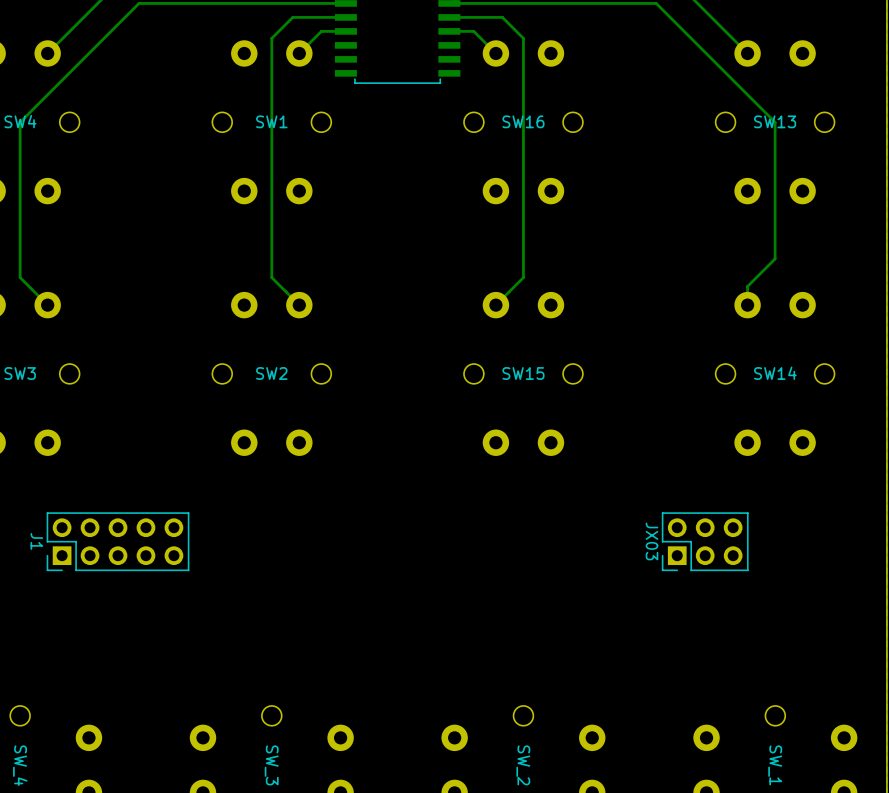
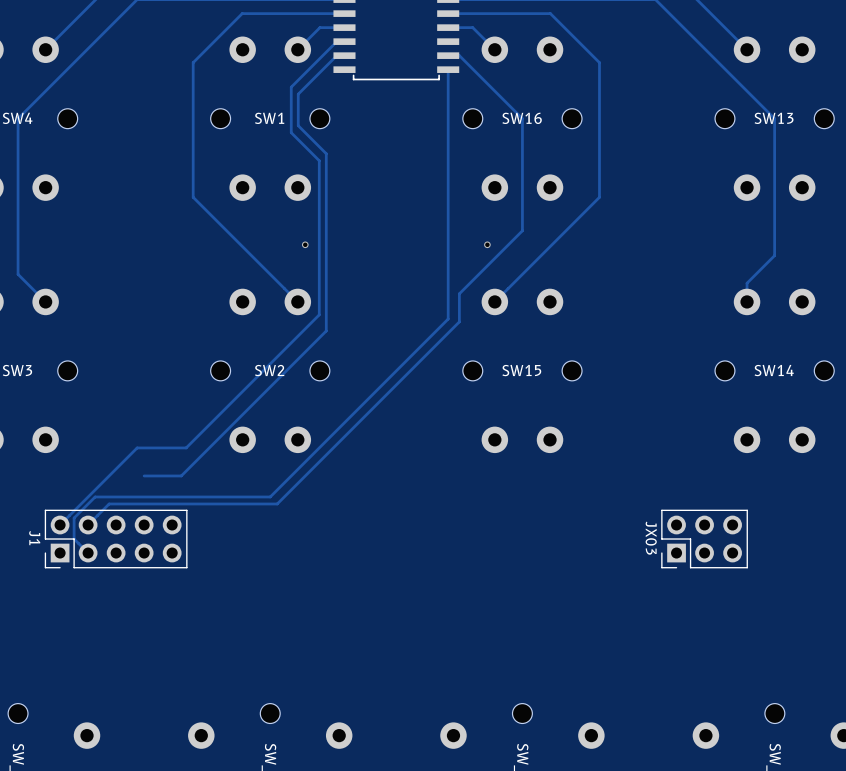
track: (292, 17) (271, 38) (271, 277) -> (291, 13) (242, 13) (193, 62) (193, 197) (270, 274)
track: (502, 17) (523, 38) (523, 122) -> (448, 55) (459, 55) (522, 118)
track: none -> (344, 41) (336, 41) (291, 87) (291, 132) (319, 160) (319, 314) (186, 447) (137, 447) (60, 525)
track: none -> (344, 55) (336, 55) (298, 94) (298, 125) (326, 153) (326, 330) (181, 475) (144, 475)
track: none -> (448, 69) (448, 319) (270, 496) (95, 496) (74, 518) (74, 539) (88, 553)
track: (523, 234) (523, 277) -> (501, 13) (550, 13) (599, 62) (599, 197) (522, 274)
track: none -> (522, 230) (459, 293) (459, 321) (277, 503) (109, 503) (88, 525)
via: none -> (305, 244)
via: none -> (487, 244)

